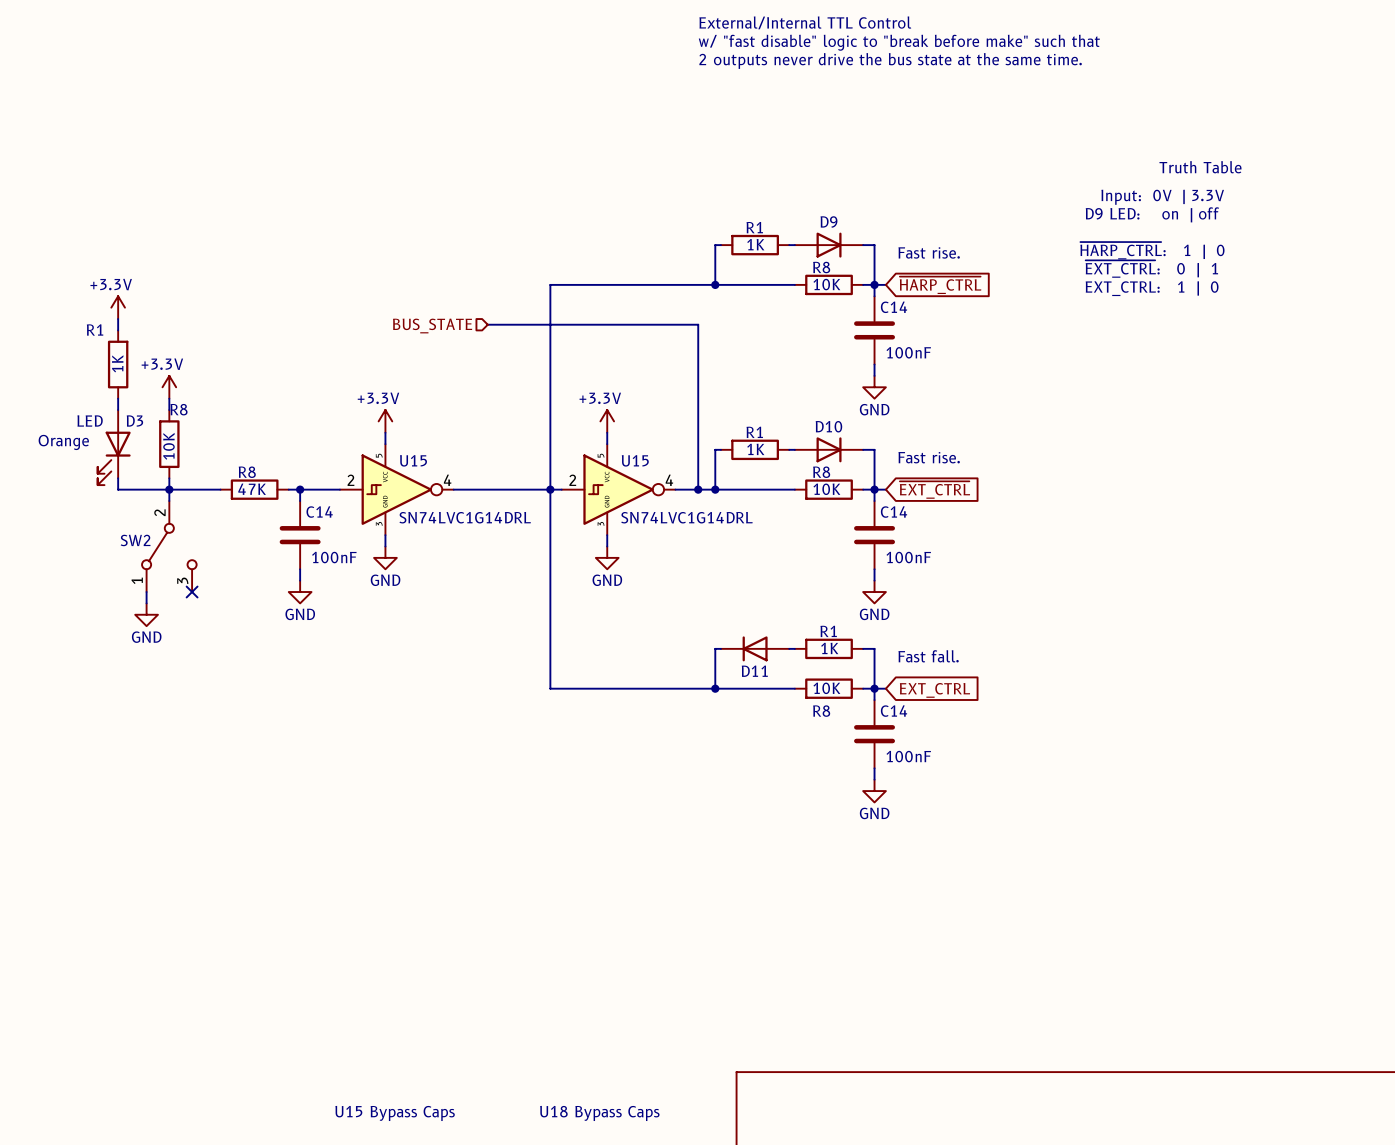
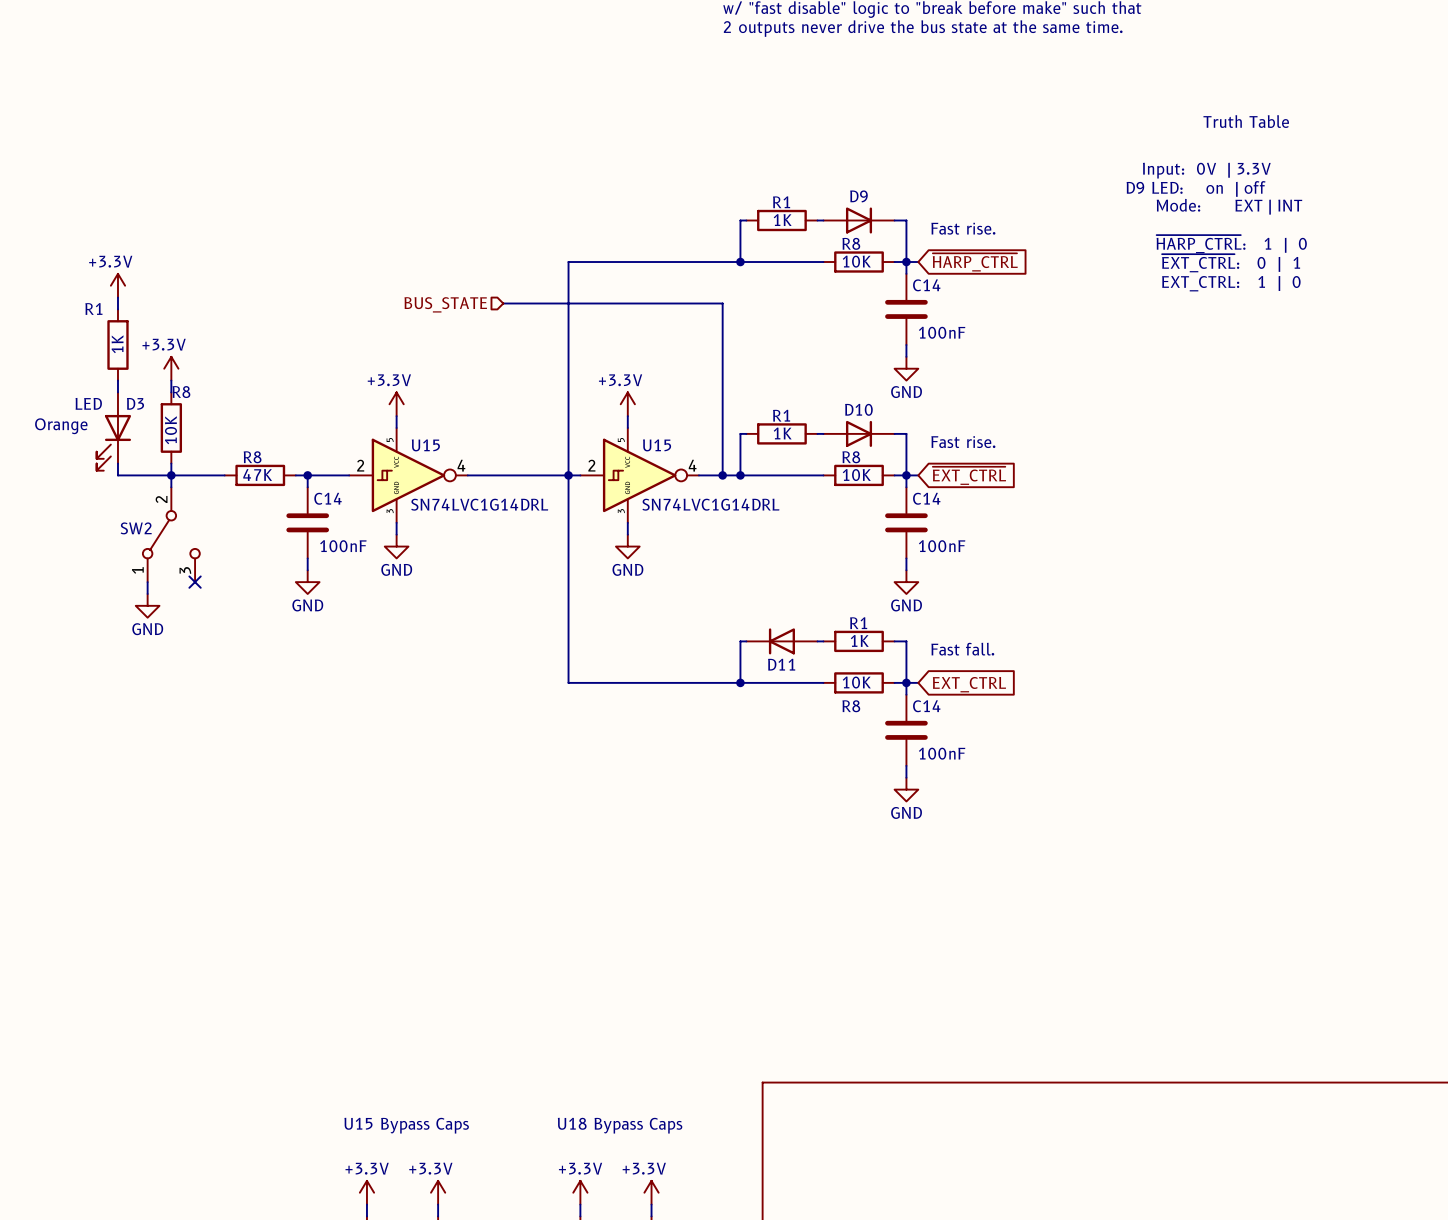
text position: Truth Table (1200, 167) -> Truth Table (1246, 121)
text: none -> Mode: EXT | INT (1229, 206)
text position: ~{HARP_CTRL}: 1 | 0 (1152, 250) -> ~{HARP_CTRL}: 1 | 0 (1231, 244)
text position: ~{EXT_CTRL}: 0 | 1 (1151, 269) -> ~{EXT_CTRL}: 0 | 1 (1231, 263)
text position: EXT_CTRL: 1 | 0 (1152, 288) -> EXT_CTRL: 1 | 0 (1231, 283)

